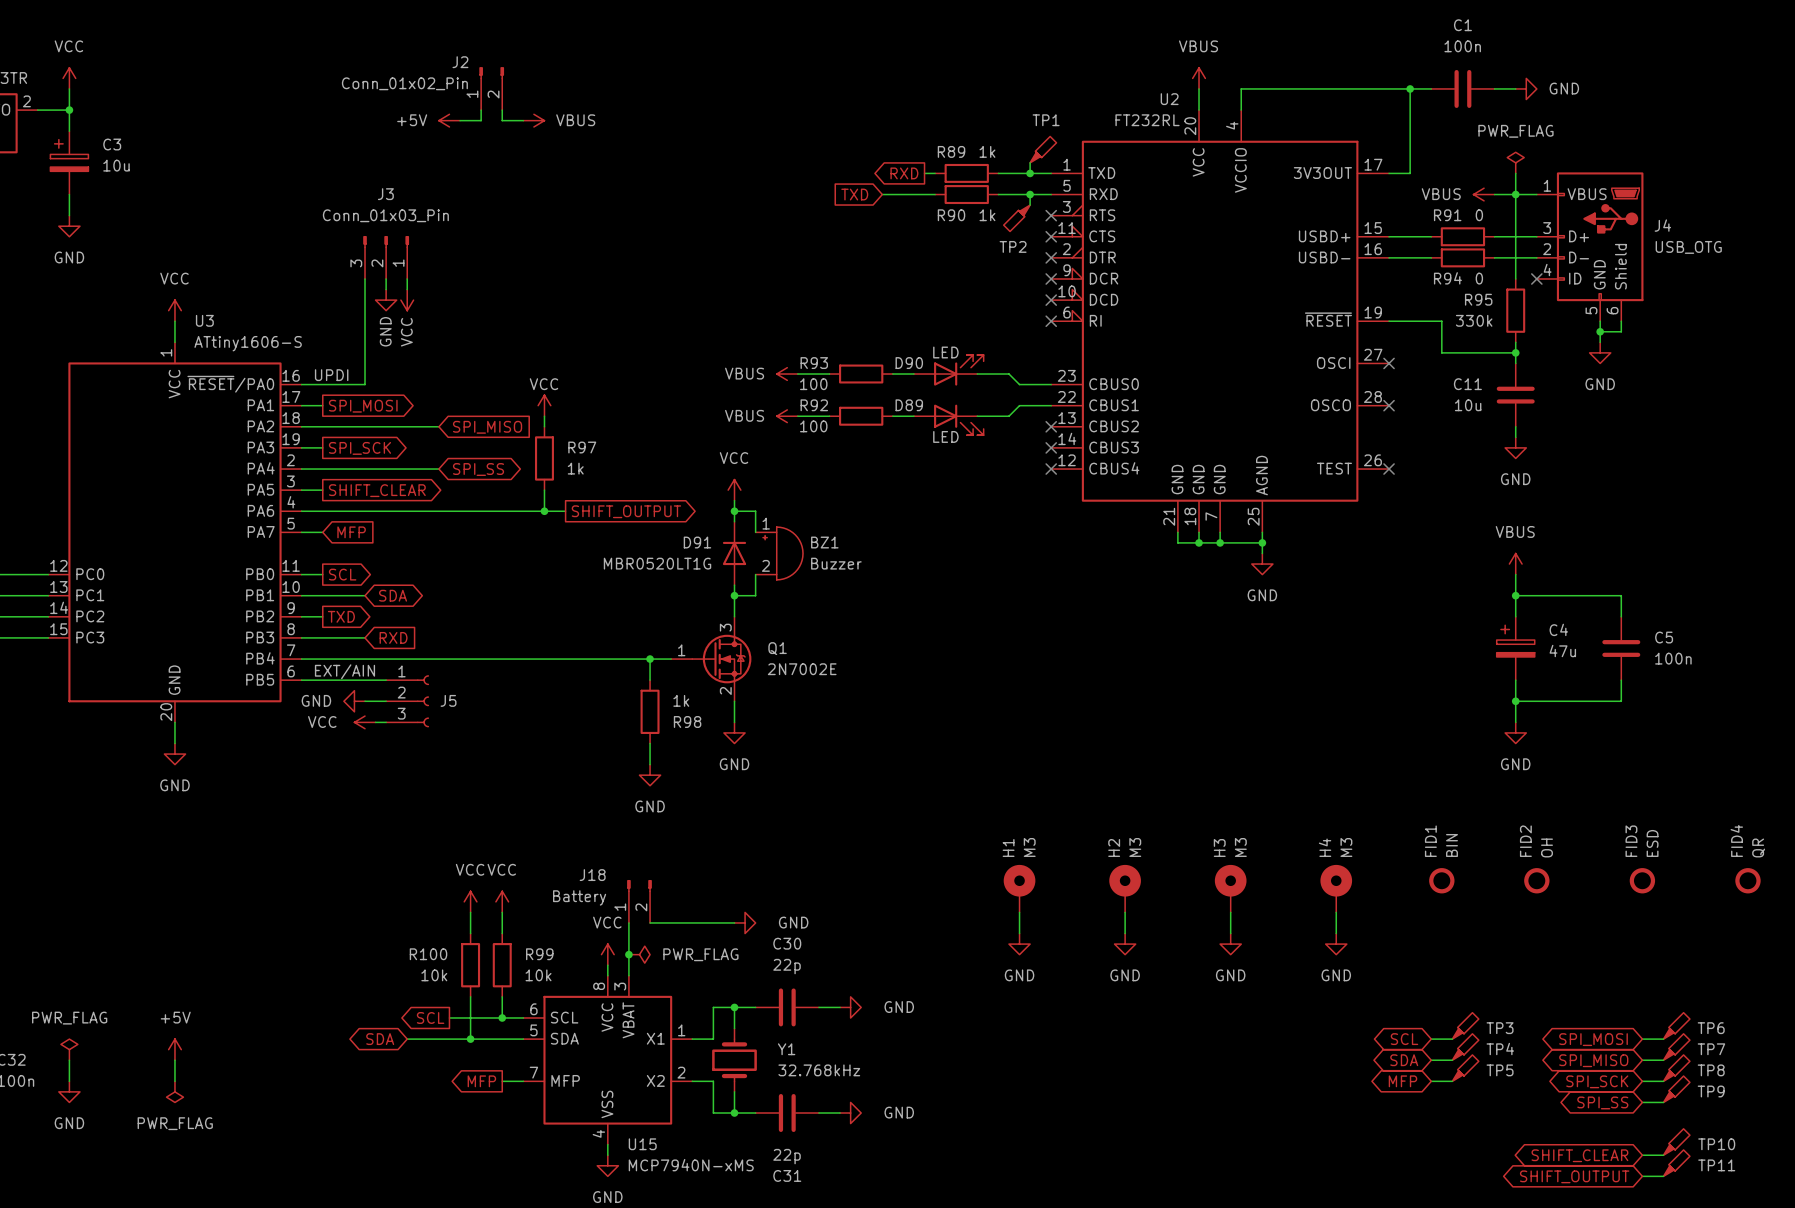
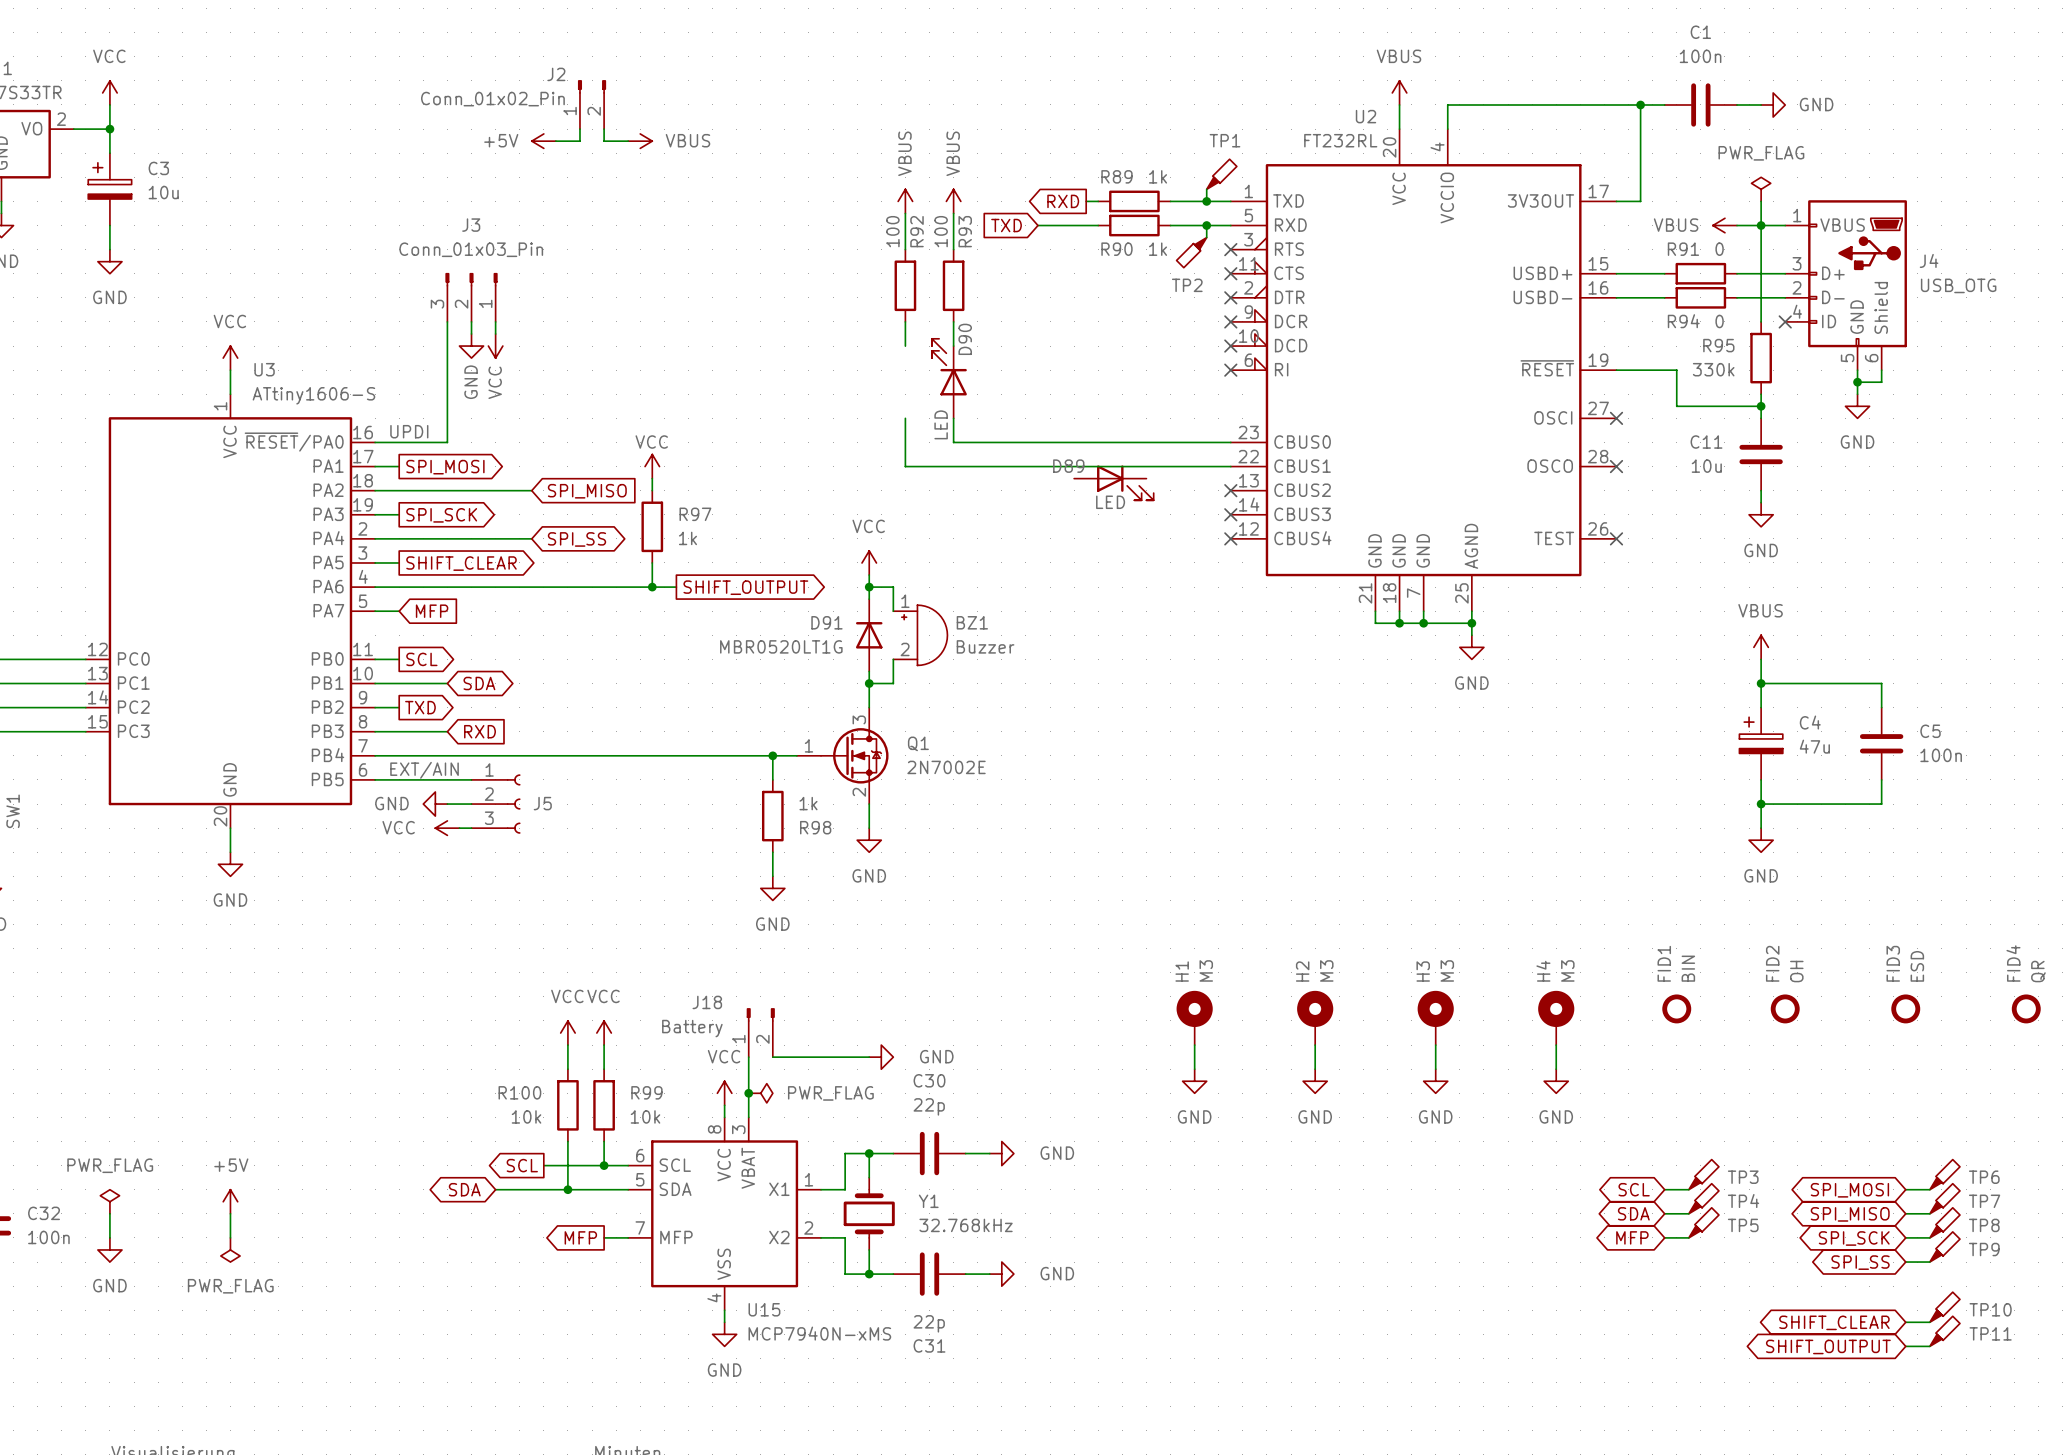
power symbol: none -> VBUS (905, 201)
power symbol: none -> VBUS (953, 201)
wire: none -> (905, 213) (905, 249)
wire: none -> (953, 213) (953, 249)
wire: none -> (905, 321) (905, 346)
wire: none -> (953, 321) (953, 346)
D90 value position: LED (945, 352) -> LED (941, 424)
D90 name position: D90 (909, 363) -> D90 (965, 339)
D90 position: (948, 370) -> (949, 378)
D90 rotation: 0° (958, 370) -> 90° counterclockwise (949, 367)
power symbol: VBUS (787, 374) -> none
wire: (797, 374) (829, 374) -> none
R93 rotation: 0° (861, 374) -> 90° clockwise (953, 285)
R93 position: (861, 374) -> (953, 285)
wire: (892, 374) (913, 374) -> none
wire: (977, 374) (1008, 374) (1019, 384) -> (953, 418) (953, 442) (1194, 442)
wire: (1019, 405) (1008, 416) (977, 416) -> (1194, 466) (905, 466) (905, 418)
power symbol: VBUS (787, 416) -> none
wire: (797, 416) (829, 416) -> none
R92 rotation: 0° (861, 416) -> 90° clockwise (905, 285)
R92 position: (861, 416) -> (905, 285)
wire: (892, 416) (913, 416) -> none

